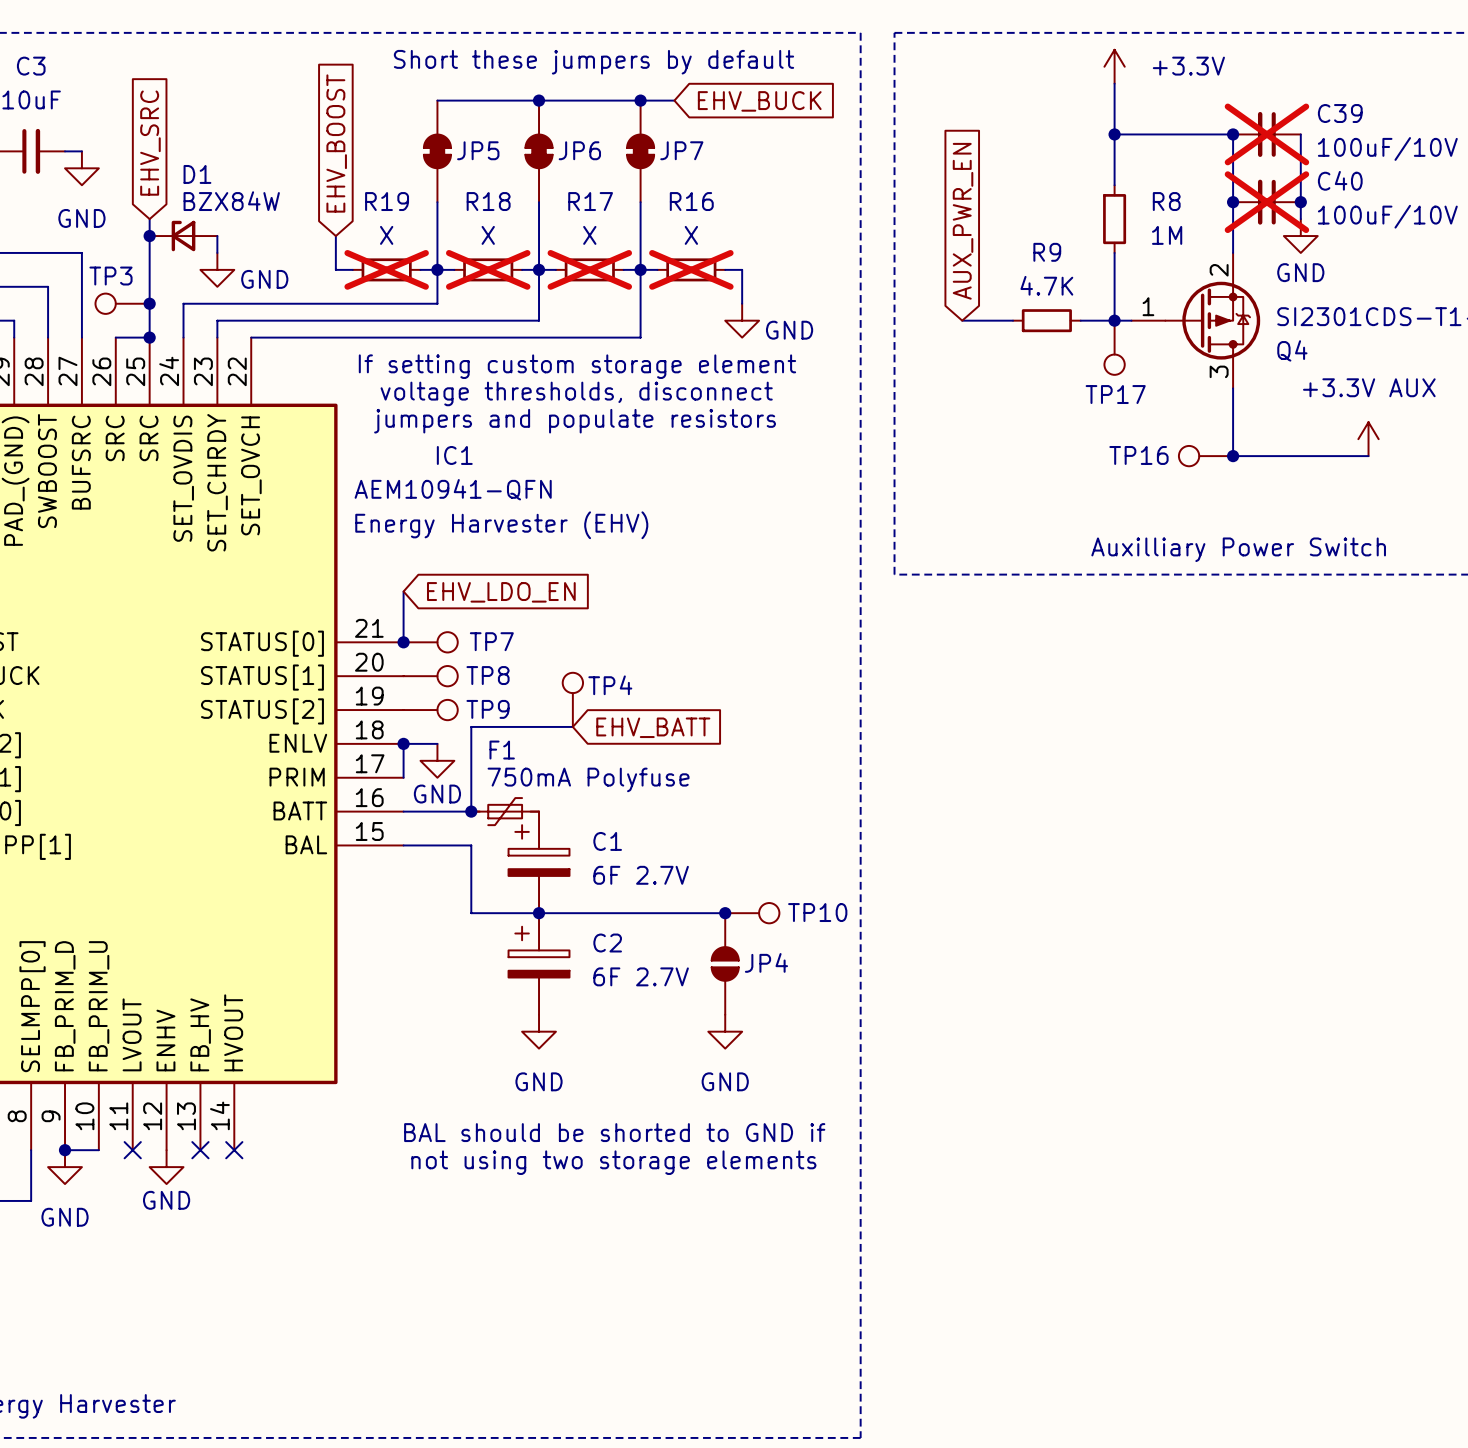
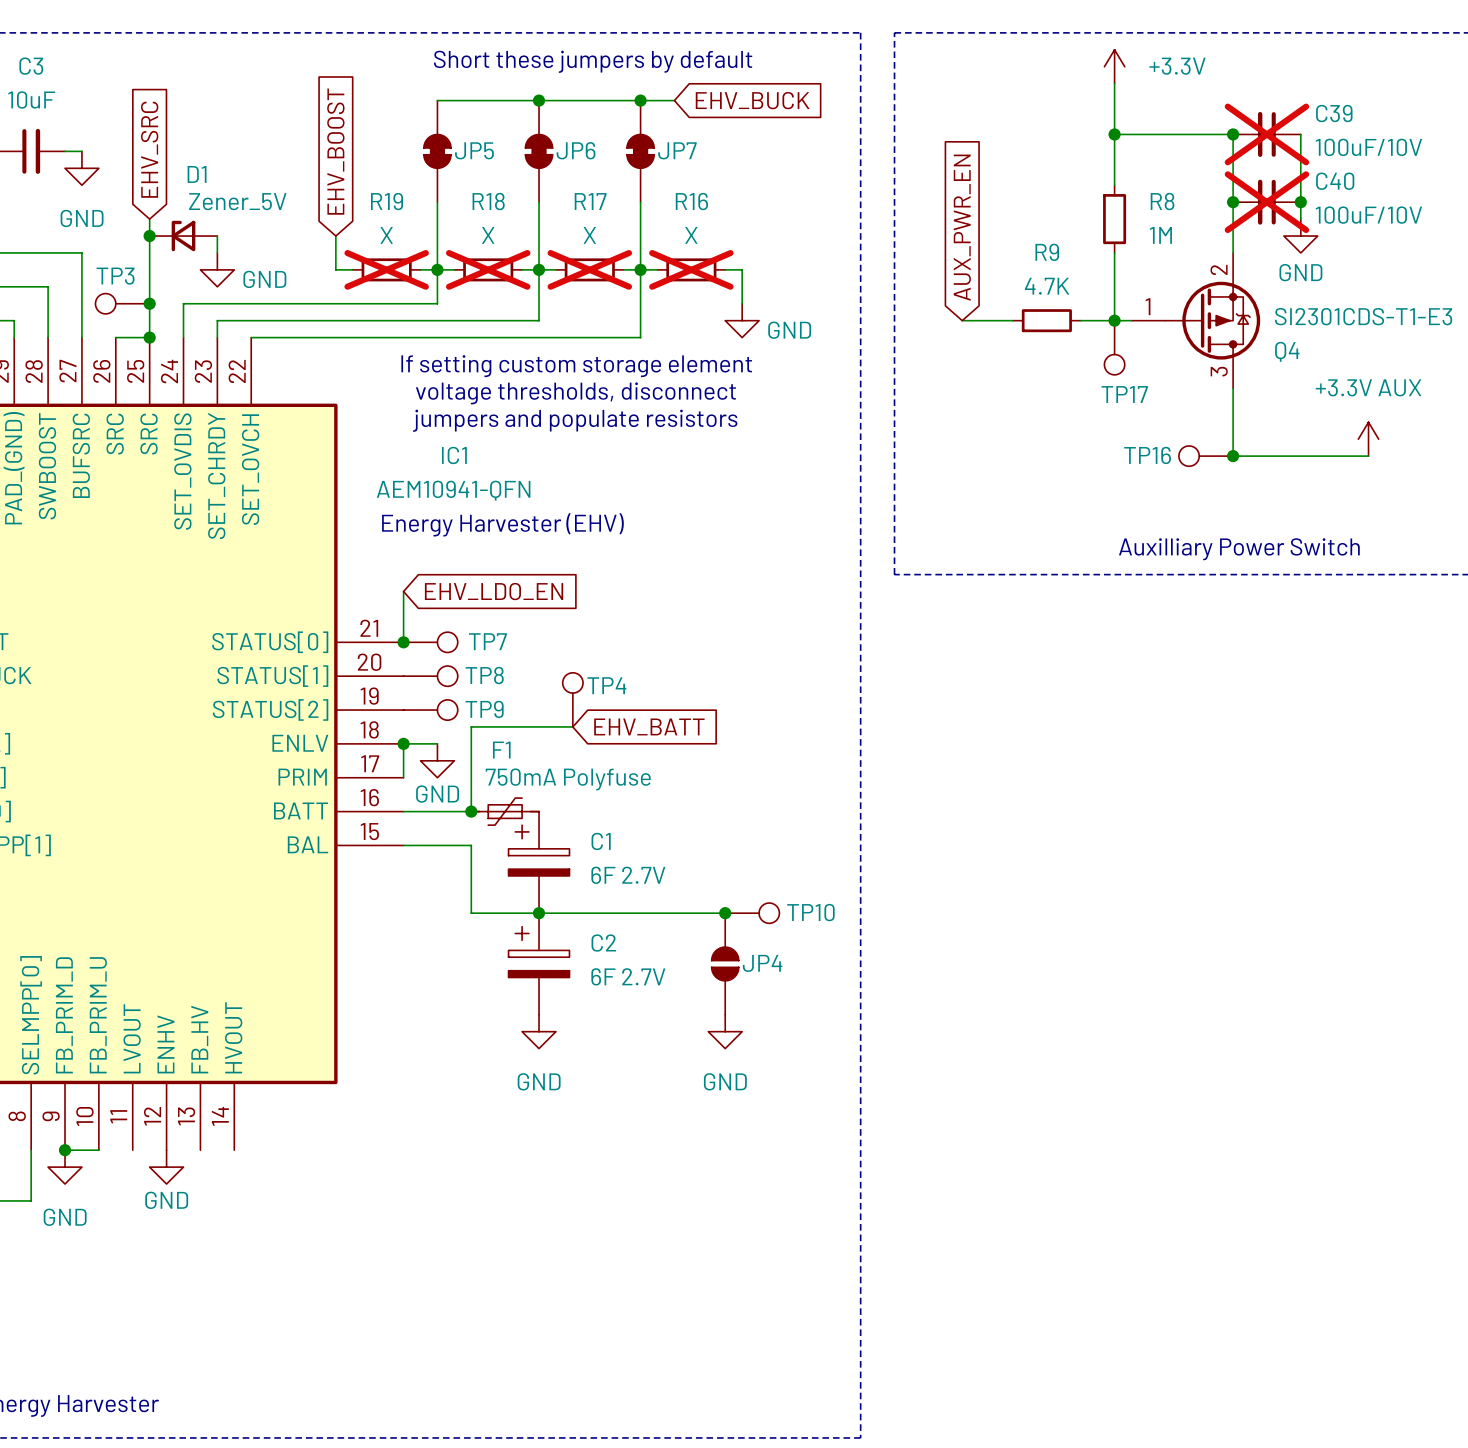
D1 value: BZX84W (231, 201) -> Zener_5V (237, 201)
text: BAL should be shorted to GND if (614, 1132) -> none
no-connect mark: (132, 1150) -> none
no-connect mark: (200, 1150) -> none
no-connect mark: (234, 1150) -> none
text: not using two storage elements (613, 1162) -> none

